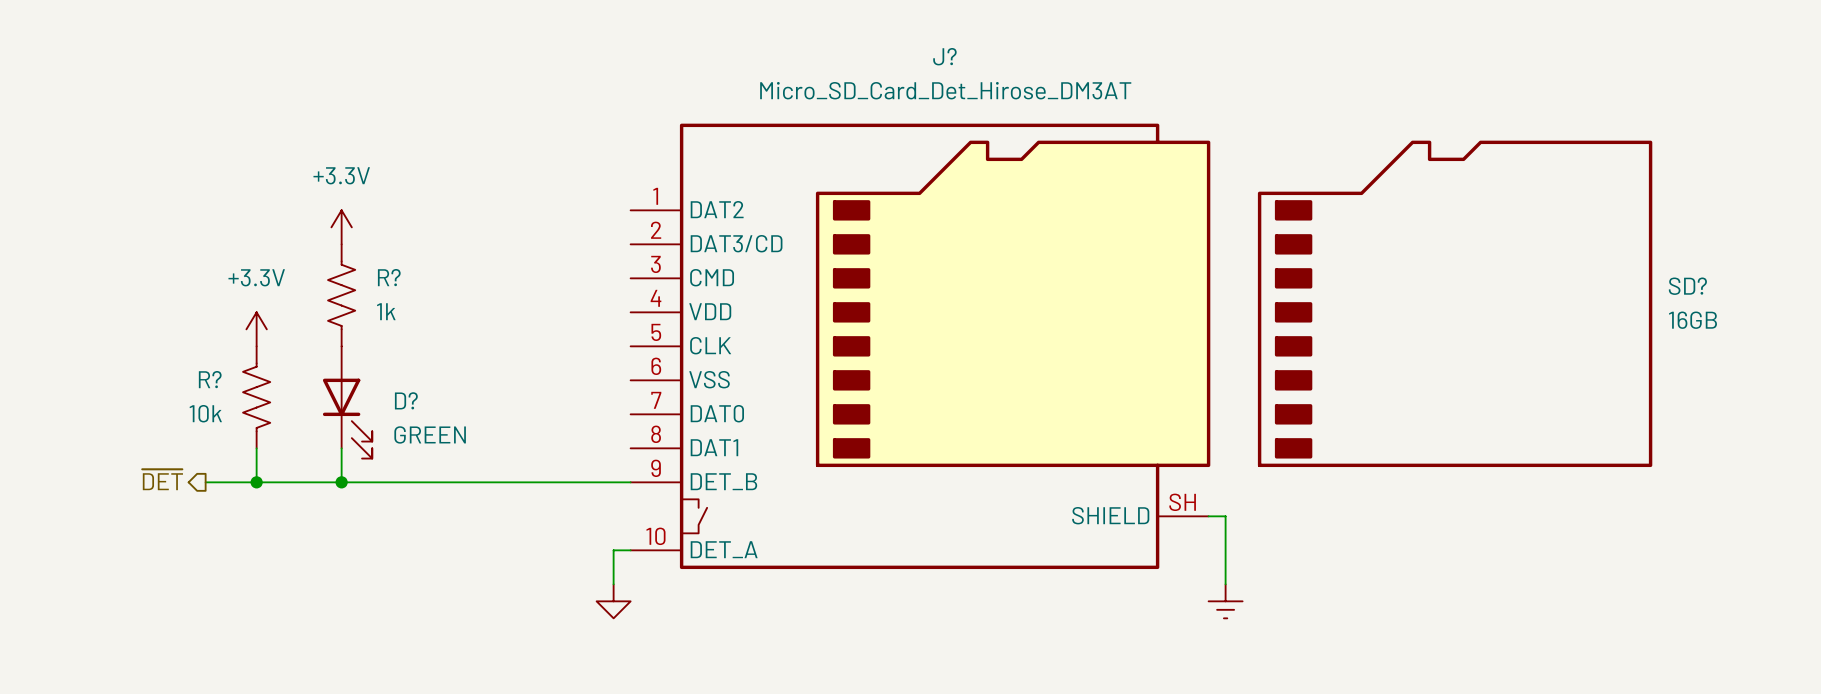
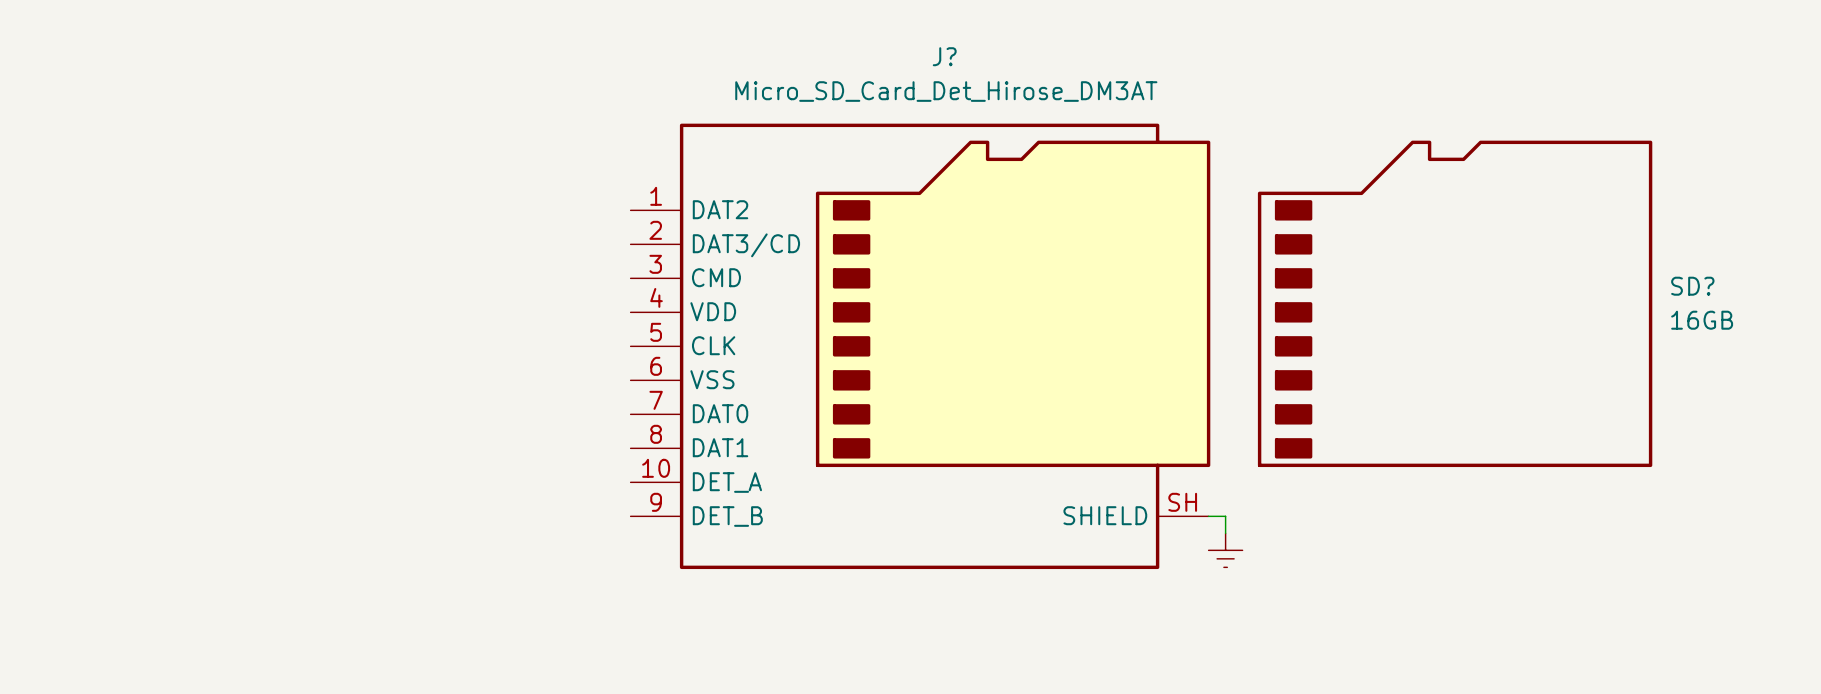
J? symbol: [630, 123, 1211, 570] -> [630, 123, 1211, 570]
power symbol: +3.3V (341, 227) -> none
R?: 1k (341, 295) -> none
power symbol: +3.3V (256, 329) -> none
R?: 10k (256, 397) -> none
D?: GREEN (347, 402) -> none
wire: (256, 448) (256, 482) -> none
wire: (341, 448) (341, 482) -> none
hierarchical label: ~{DET} (162, 479) -> none
wire: (205, 482) (630, 482) -> none
junction: (256, 482) -> none
junction: (341, 482) -> none
wire: (1225, 533) (1225, 584) -> none
wire: (630, 550) (613, 550) (613, 584) -> none
power symbol: (613, 601) -> none
power symbol position: (1225, 601) -> (1225, 550)

